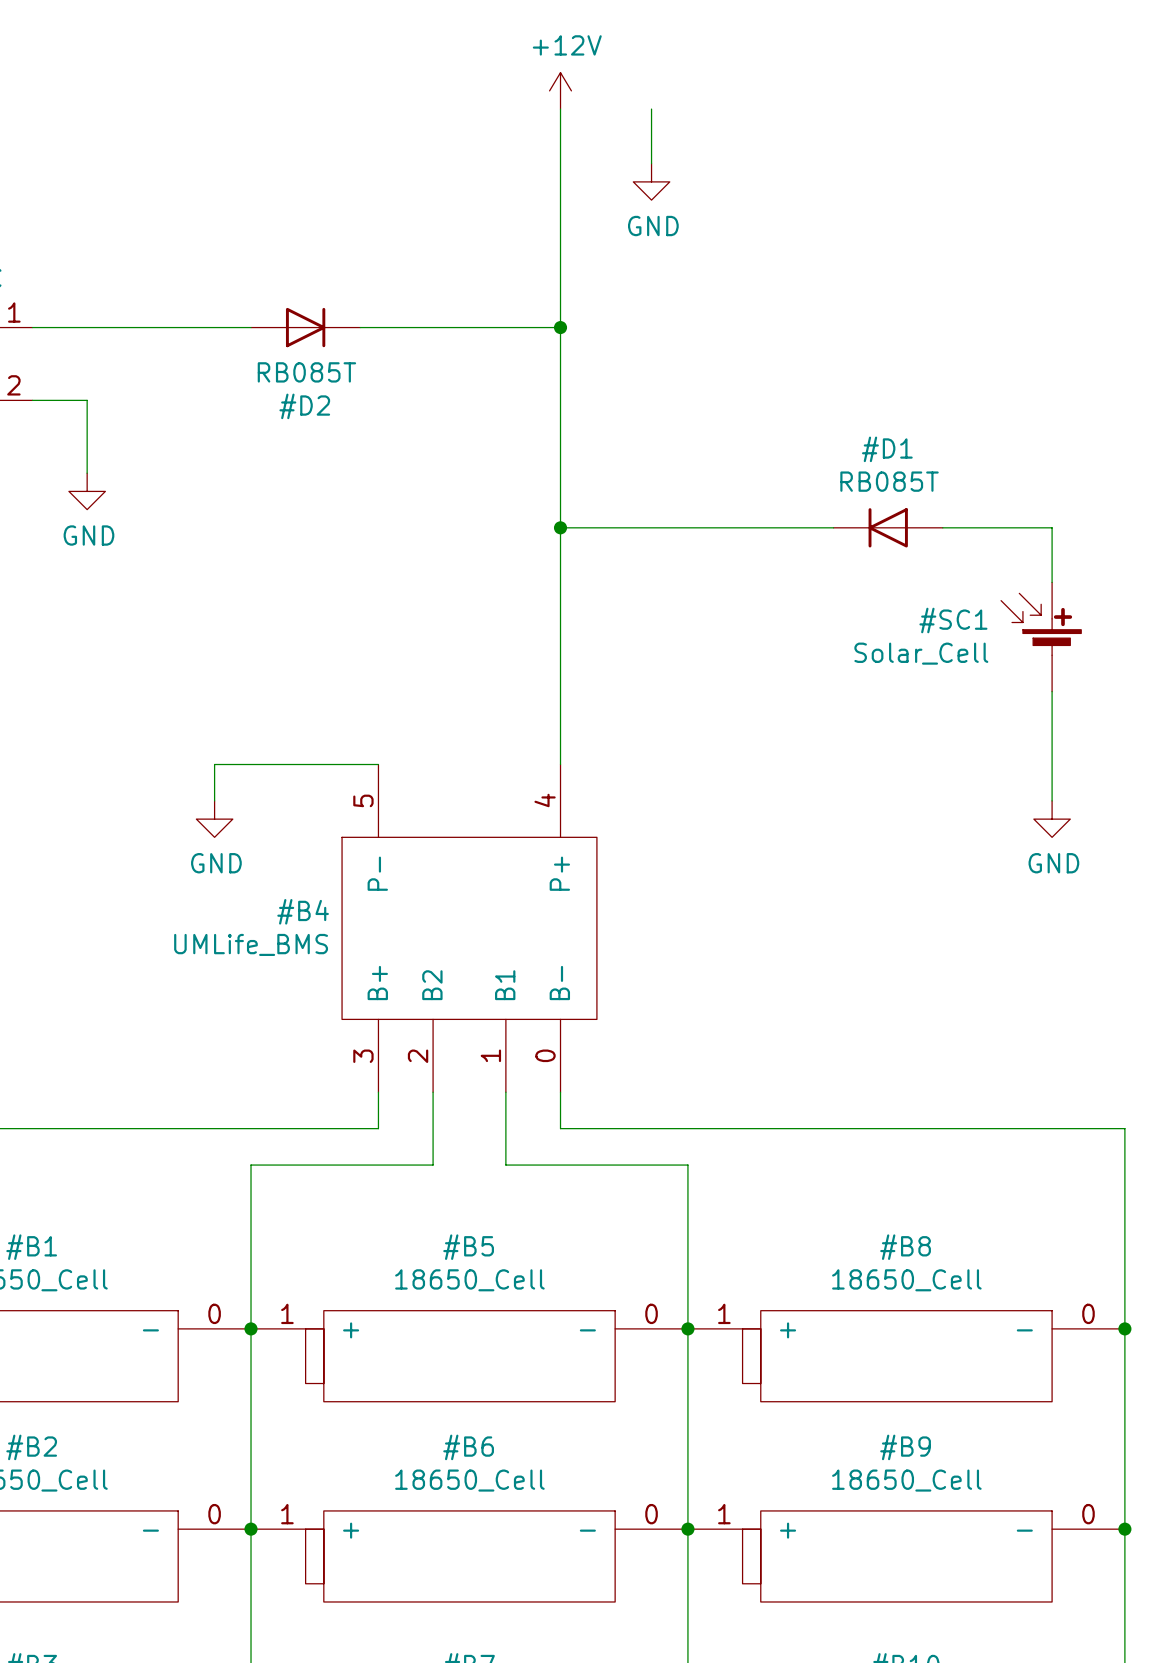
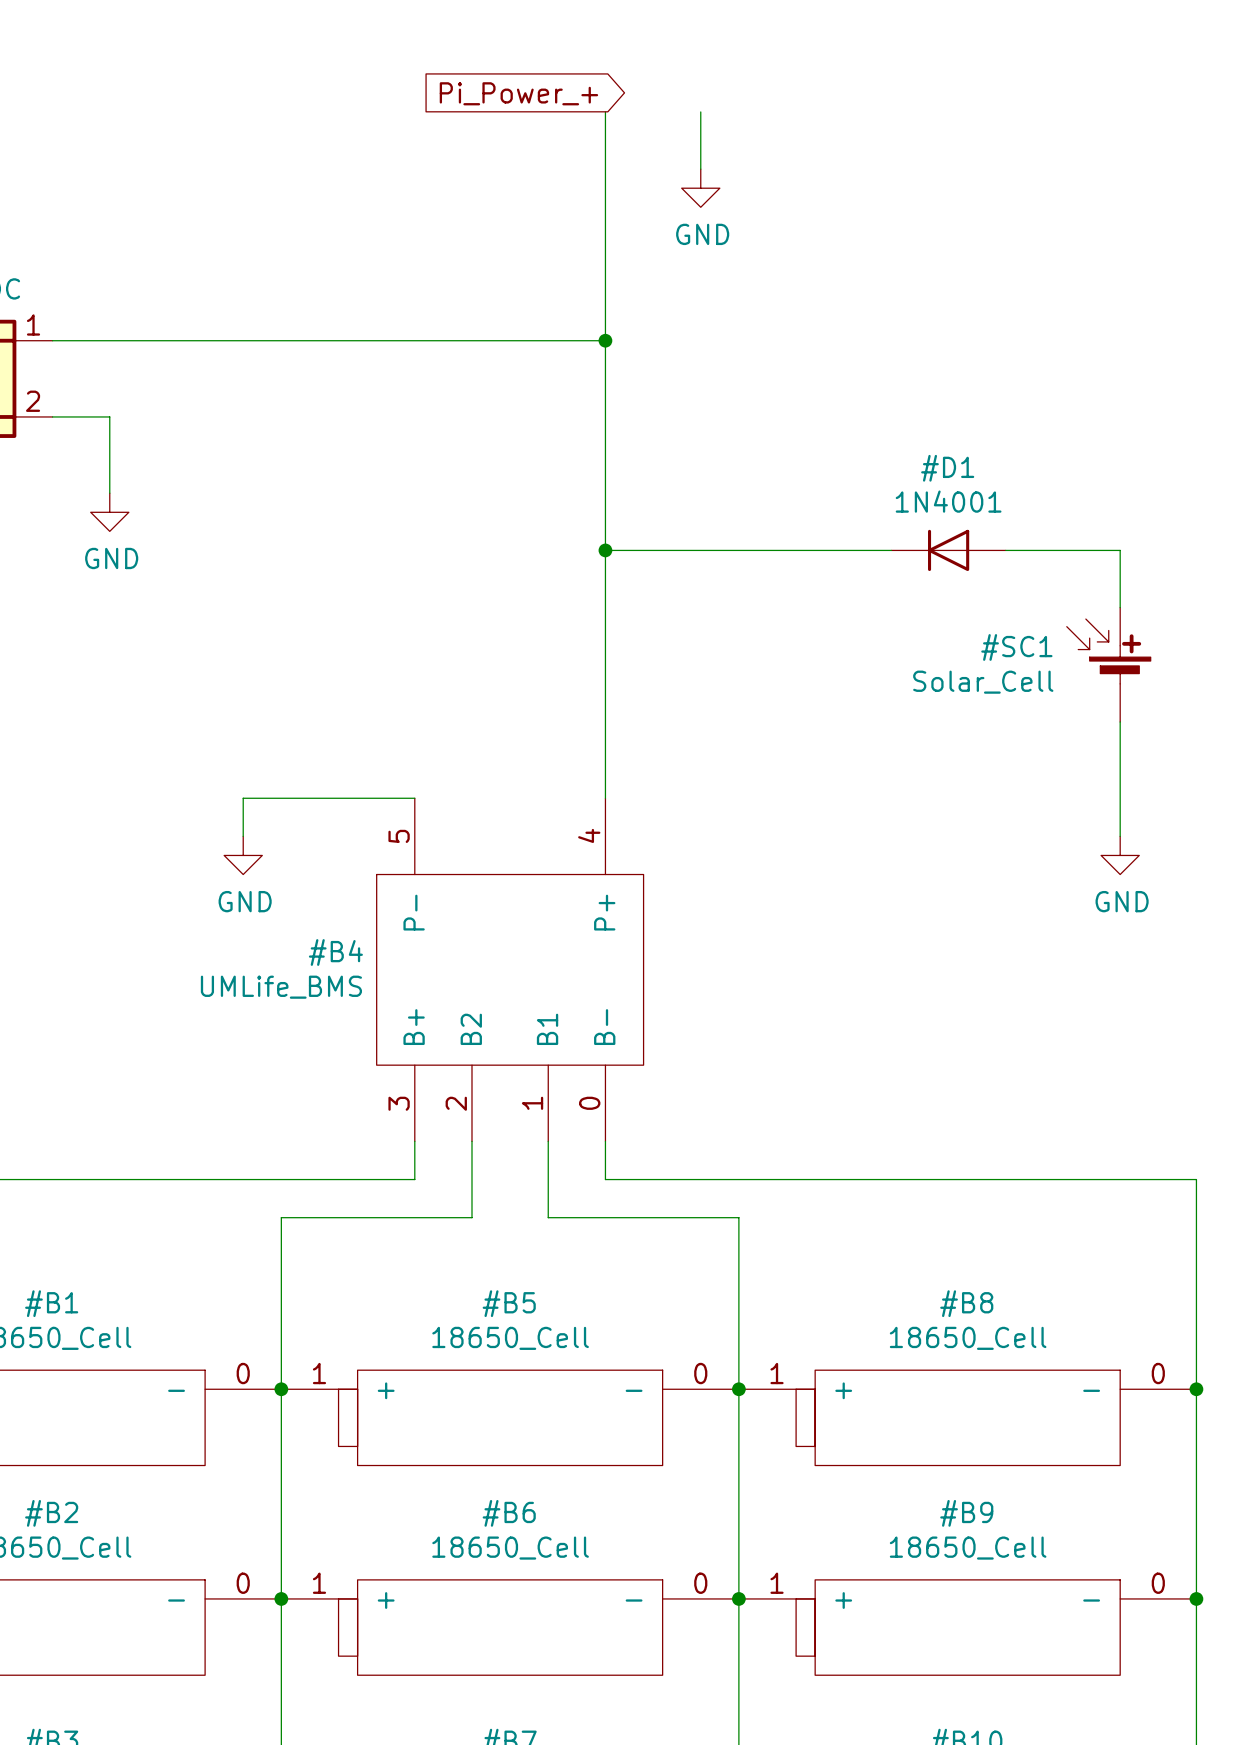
power symbol: +12V (560, 90) -> none
global label: none -> Pi_Power_+ (518, 93)
#D2: RB085T (305, 327) -> none
power symbol: RB085T (888, 527) -> 1N4001 (948, 550)

